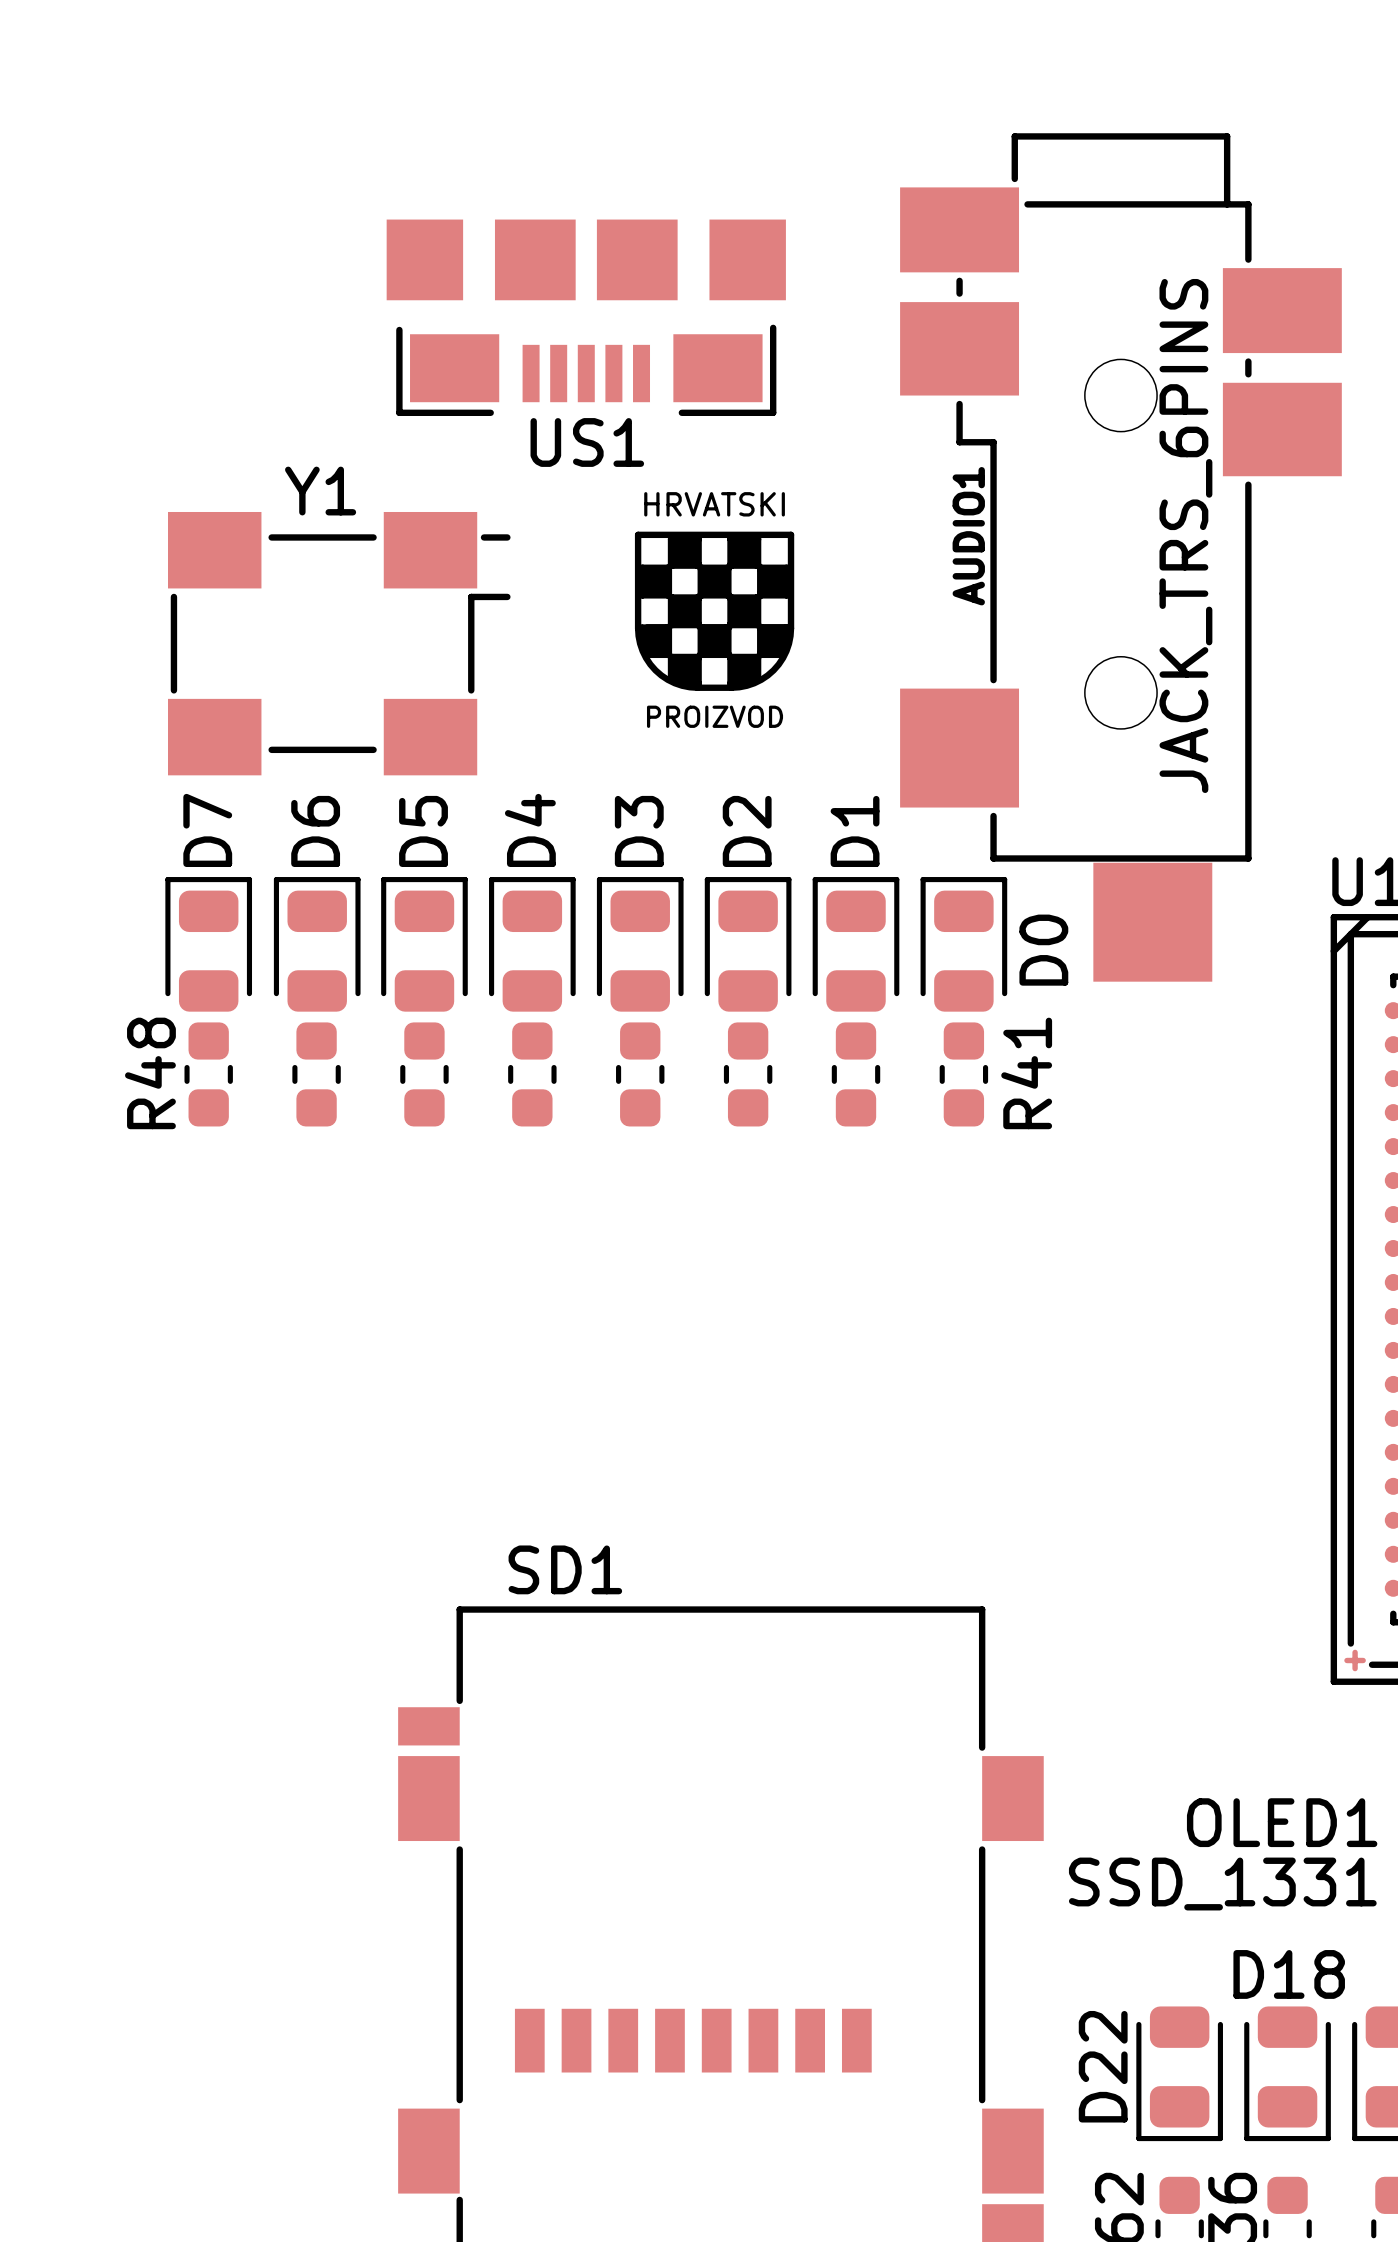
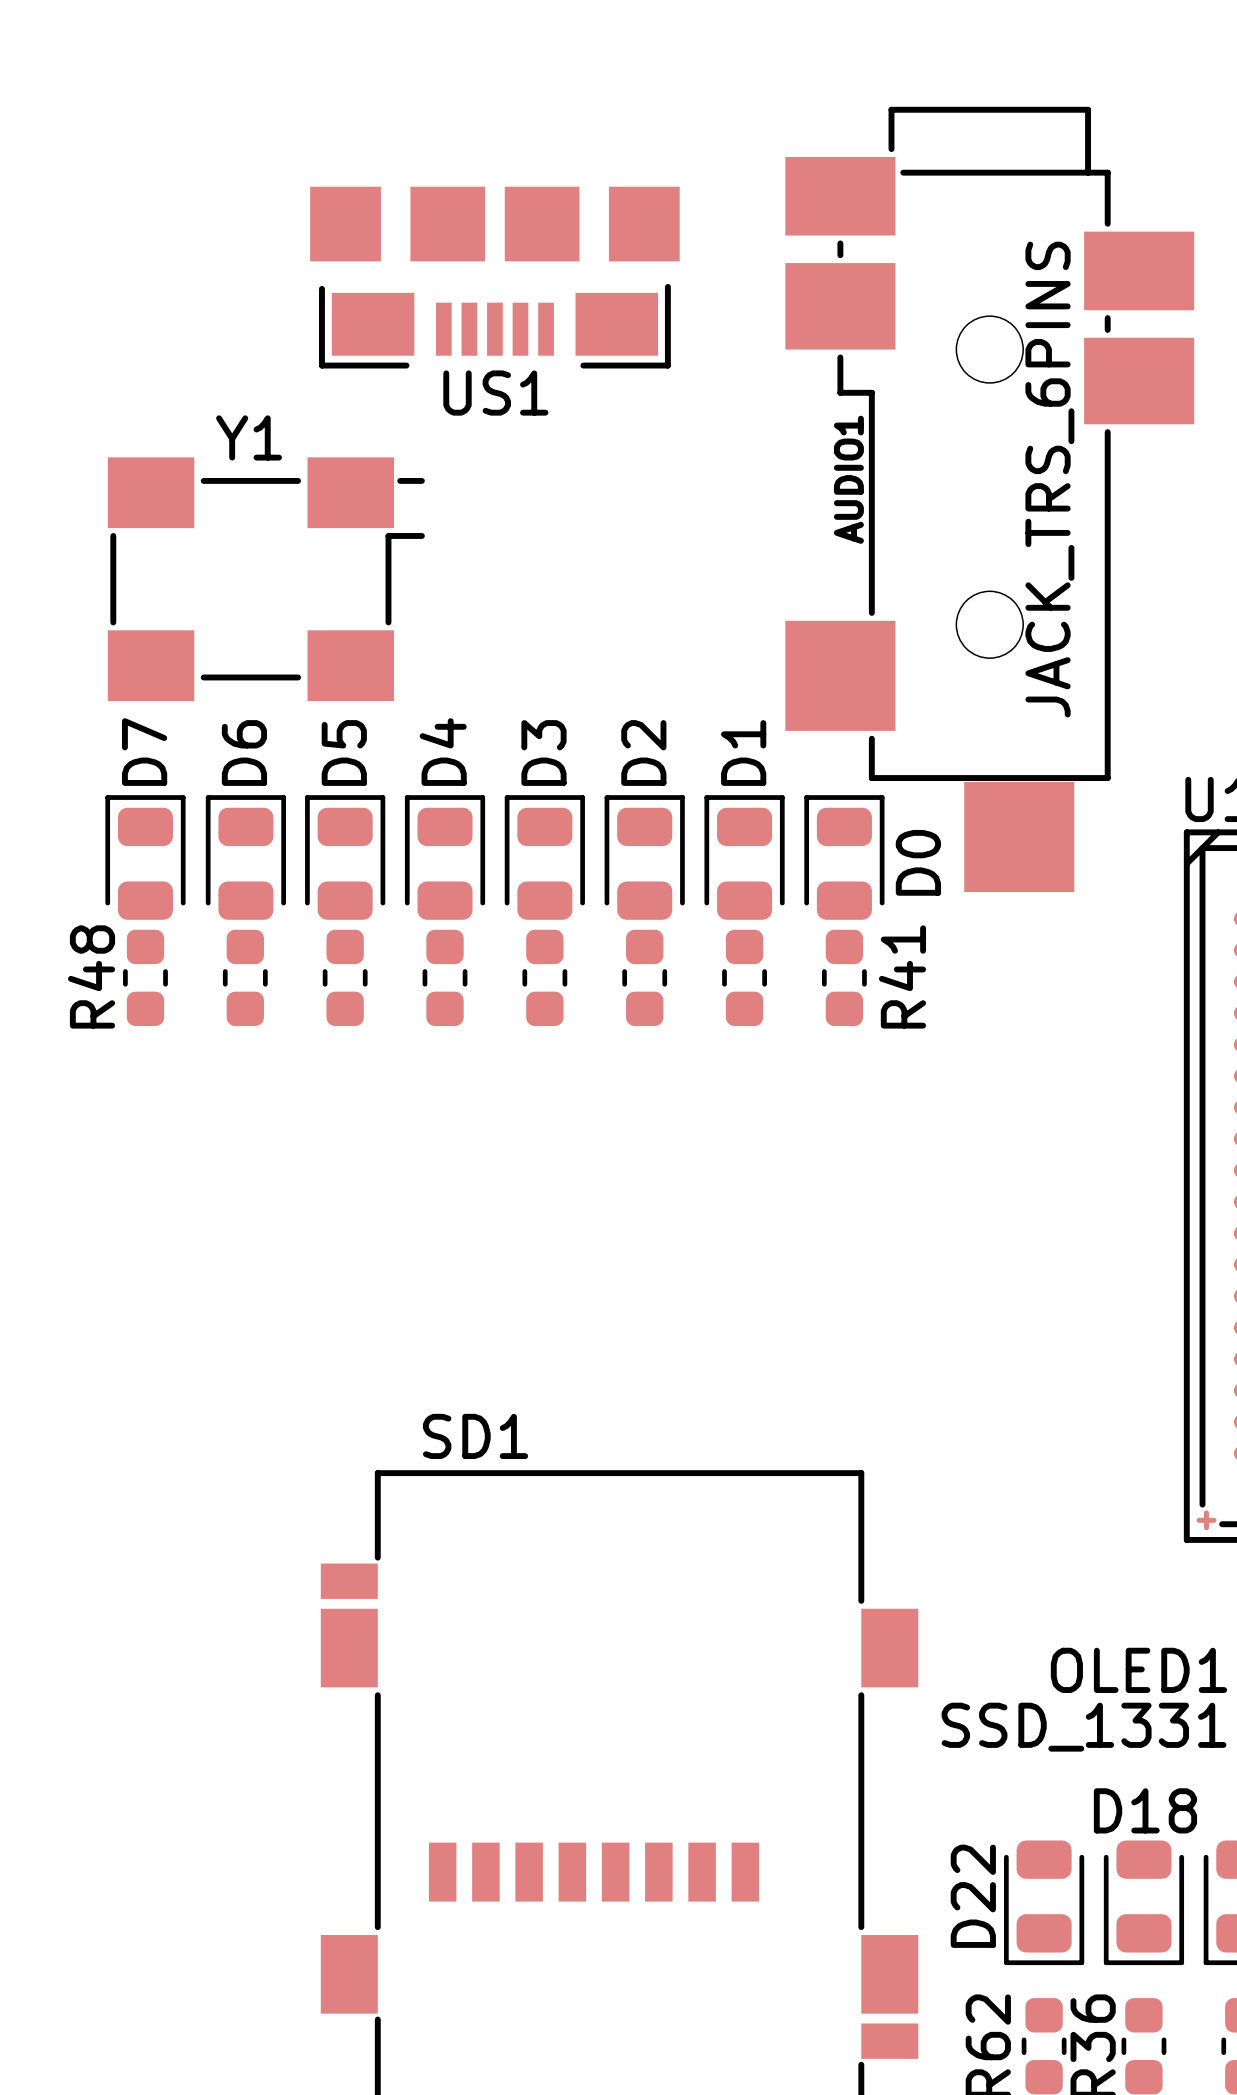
drawing: [634, 531, 795, 691] -> none

